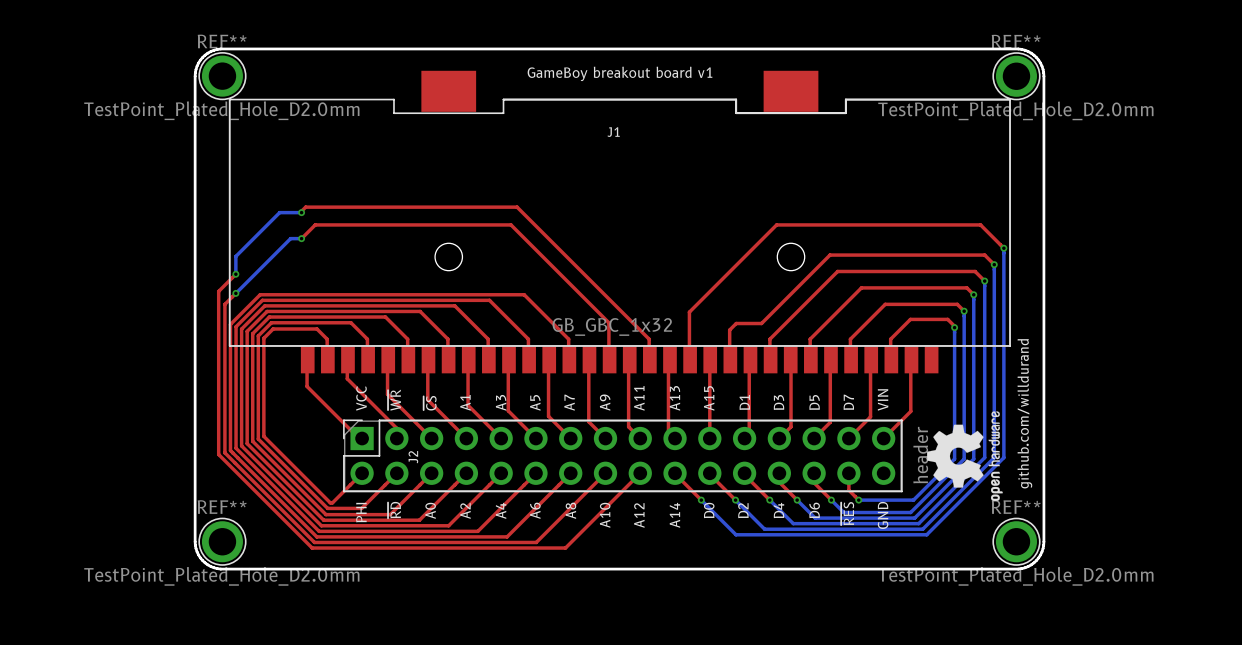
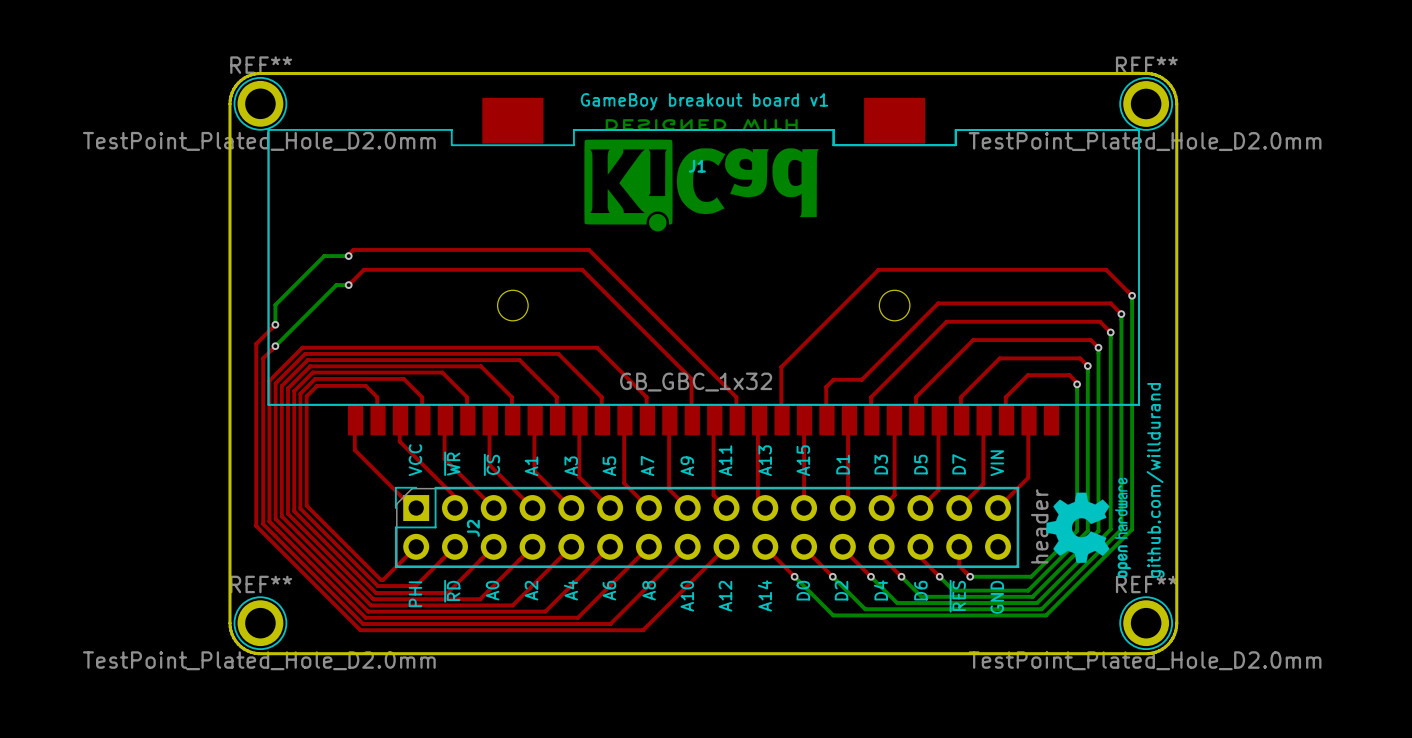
drawing: none -> [584, 119, 819, 232]

